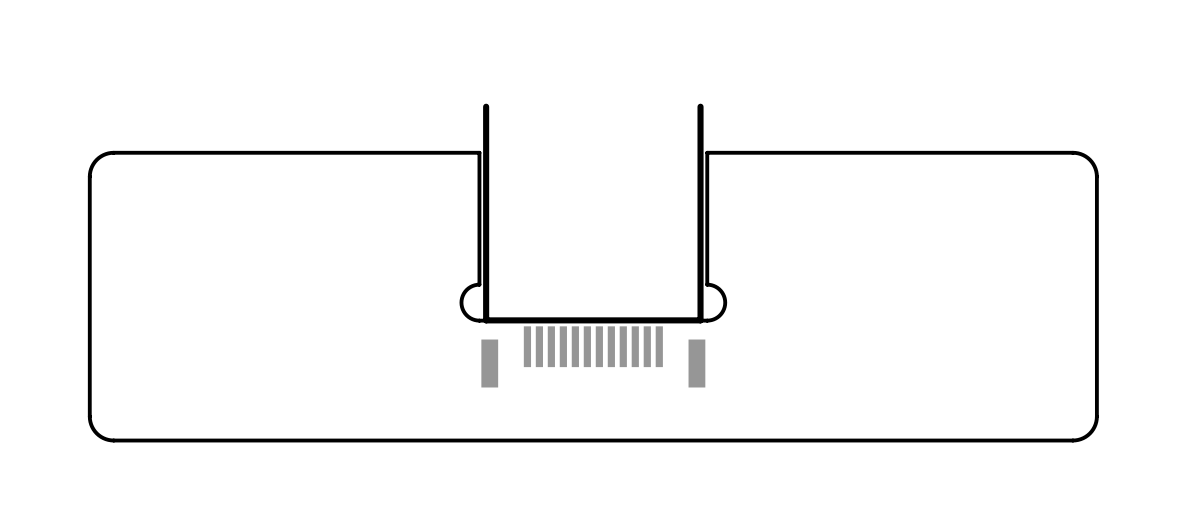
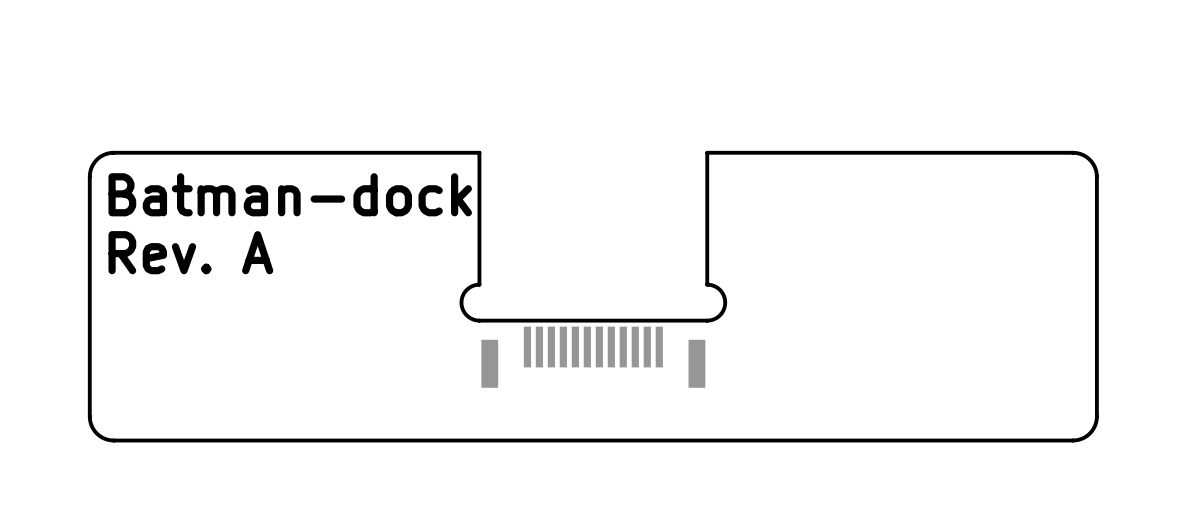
text: none -> Batman-dock (290, 194)
part: (593, 245) -> none
text: none -> Rev. A (190, 252)

